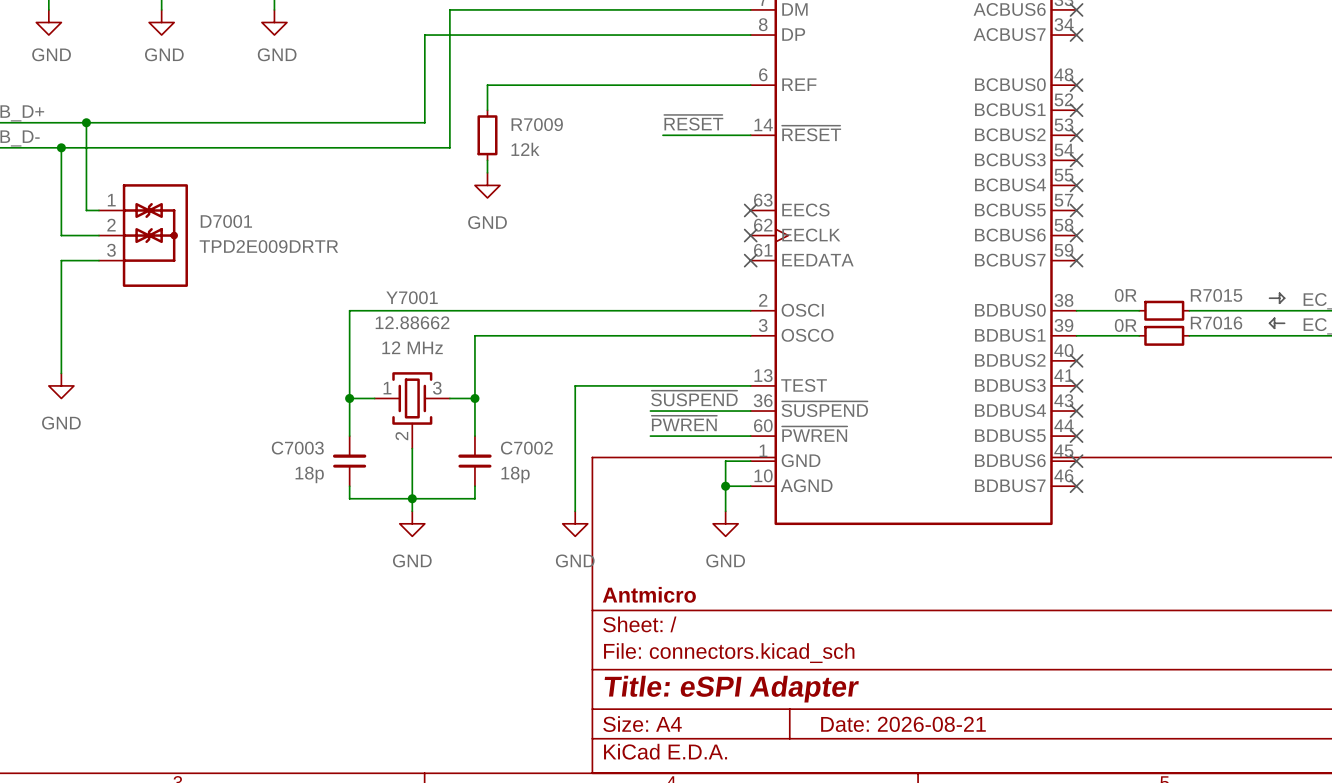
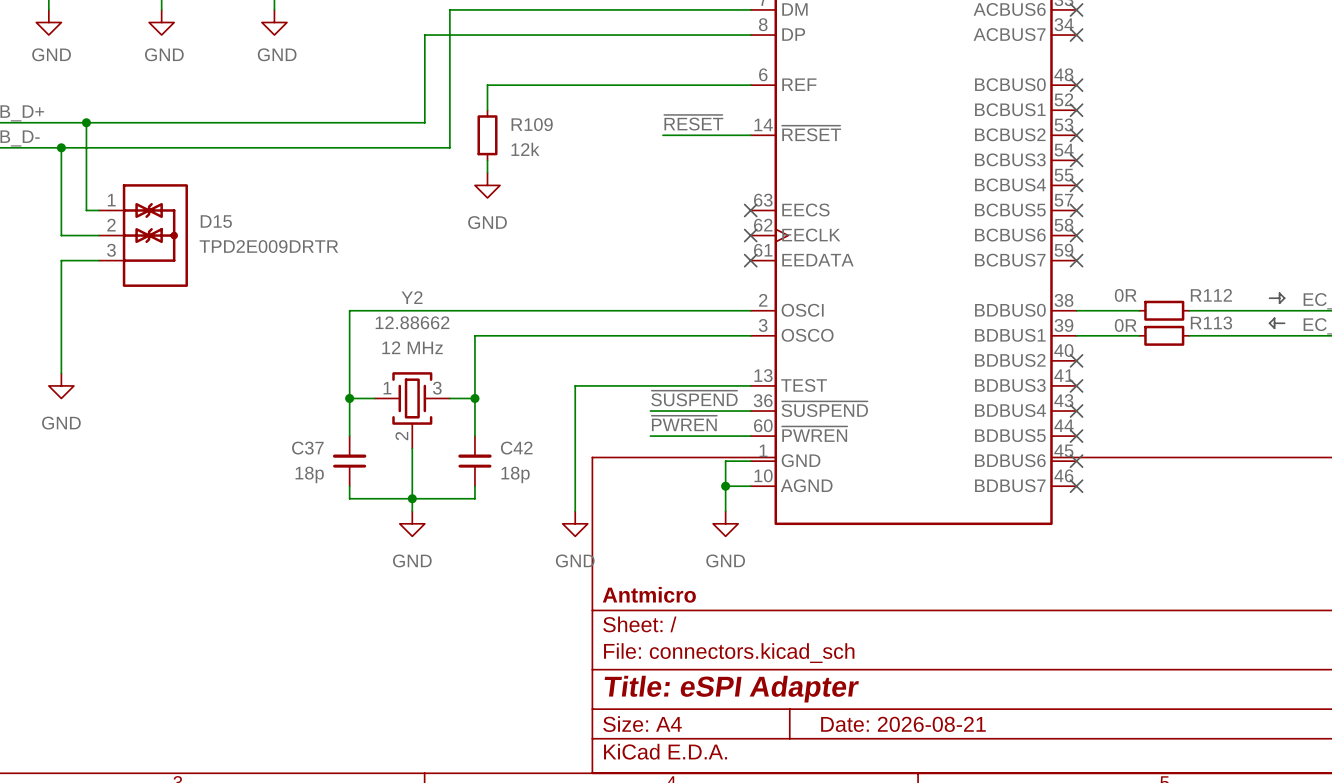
R7009 name: R7009 (537, 124) -> R109 (532, 124)
D7001 name: D7001 (226, 221) -> D15 (216, 221)
R7015 name: R7015 (1216, 295) -> R112 (1211, 295)
Y7001 name: Y7001 (412, 297) -> Y2 (412, 297)
R7016 name: R7016 (1216, 323) -> R113 (1211, 323)
C7003 name: C7003 (297, 448) -> C37 (307, 448)
C7002 name: C7002 (526, 448) -> C42 (516, 448)

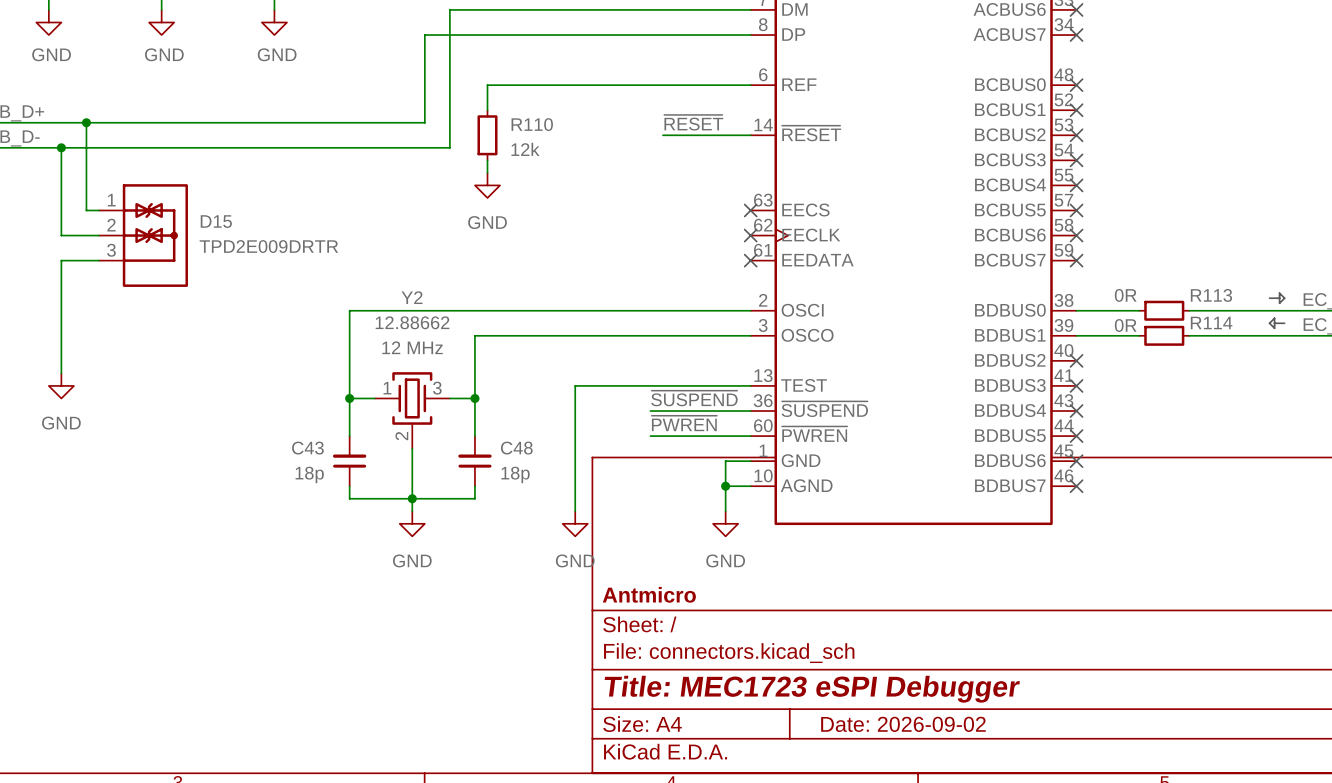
R109 name: R109 (532, 124) -> R110 (532, 124)
R112 name: R112 (1211, 295) -> R113 (1211, 295)
R113 name: R113 (1211, 323) -> R114 (1211, 323)
C37 name: C37 (307, 448) -> C43 (307, 448)
C42 name: C42 (516, 448) -> C48 (516, 448)
title block: Title: eSPI Adapter (731, 689) -> Title: MEC1723 eSPI Debugger (812, 689)
title block: Date: 2026-08-21 (903, 724) -> Date: 2026-09-02 (903, 724)

